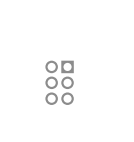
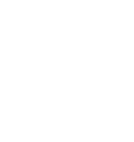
part: (59, 82) -> none

